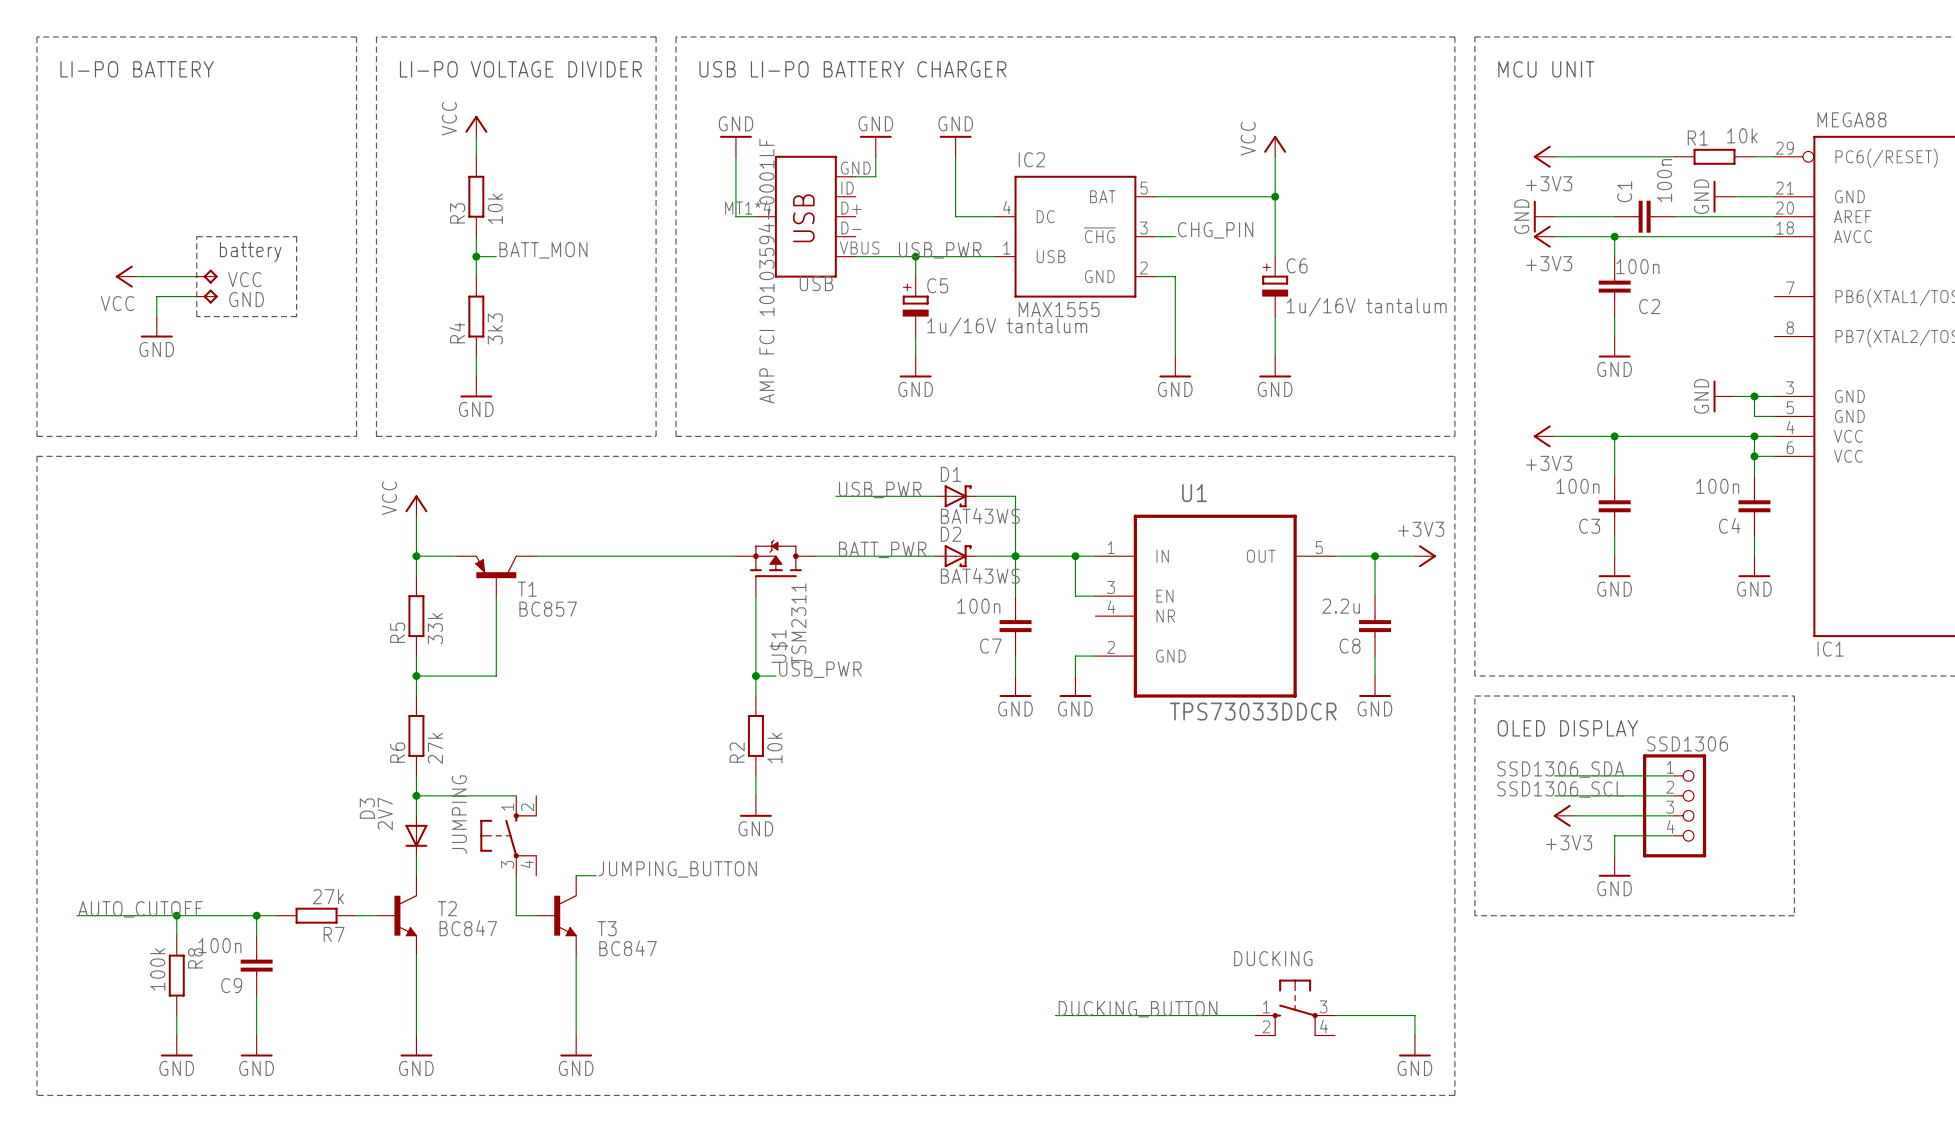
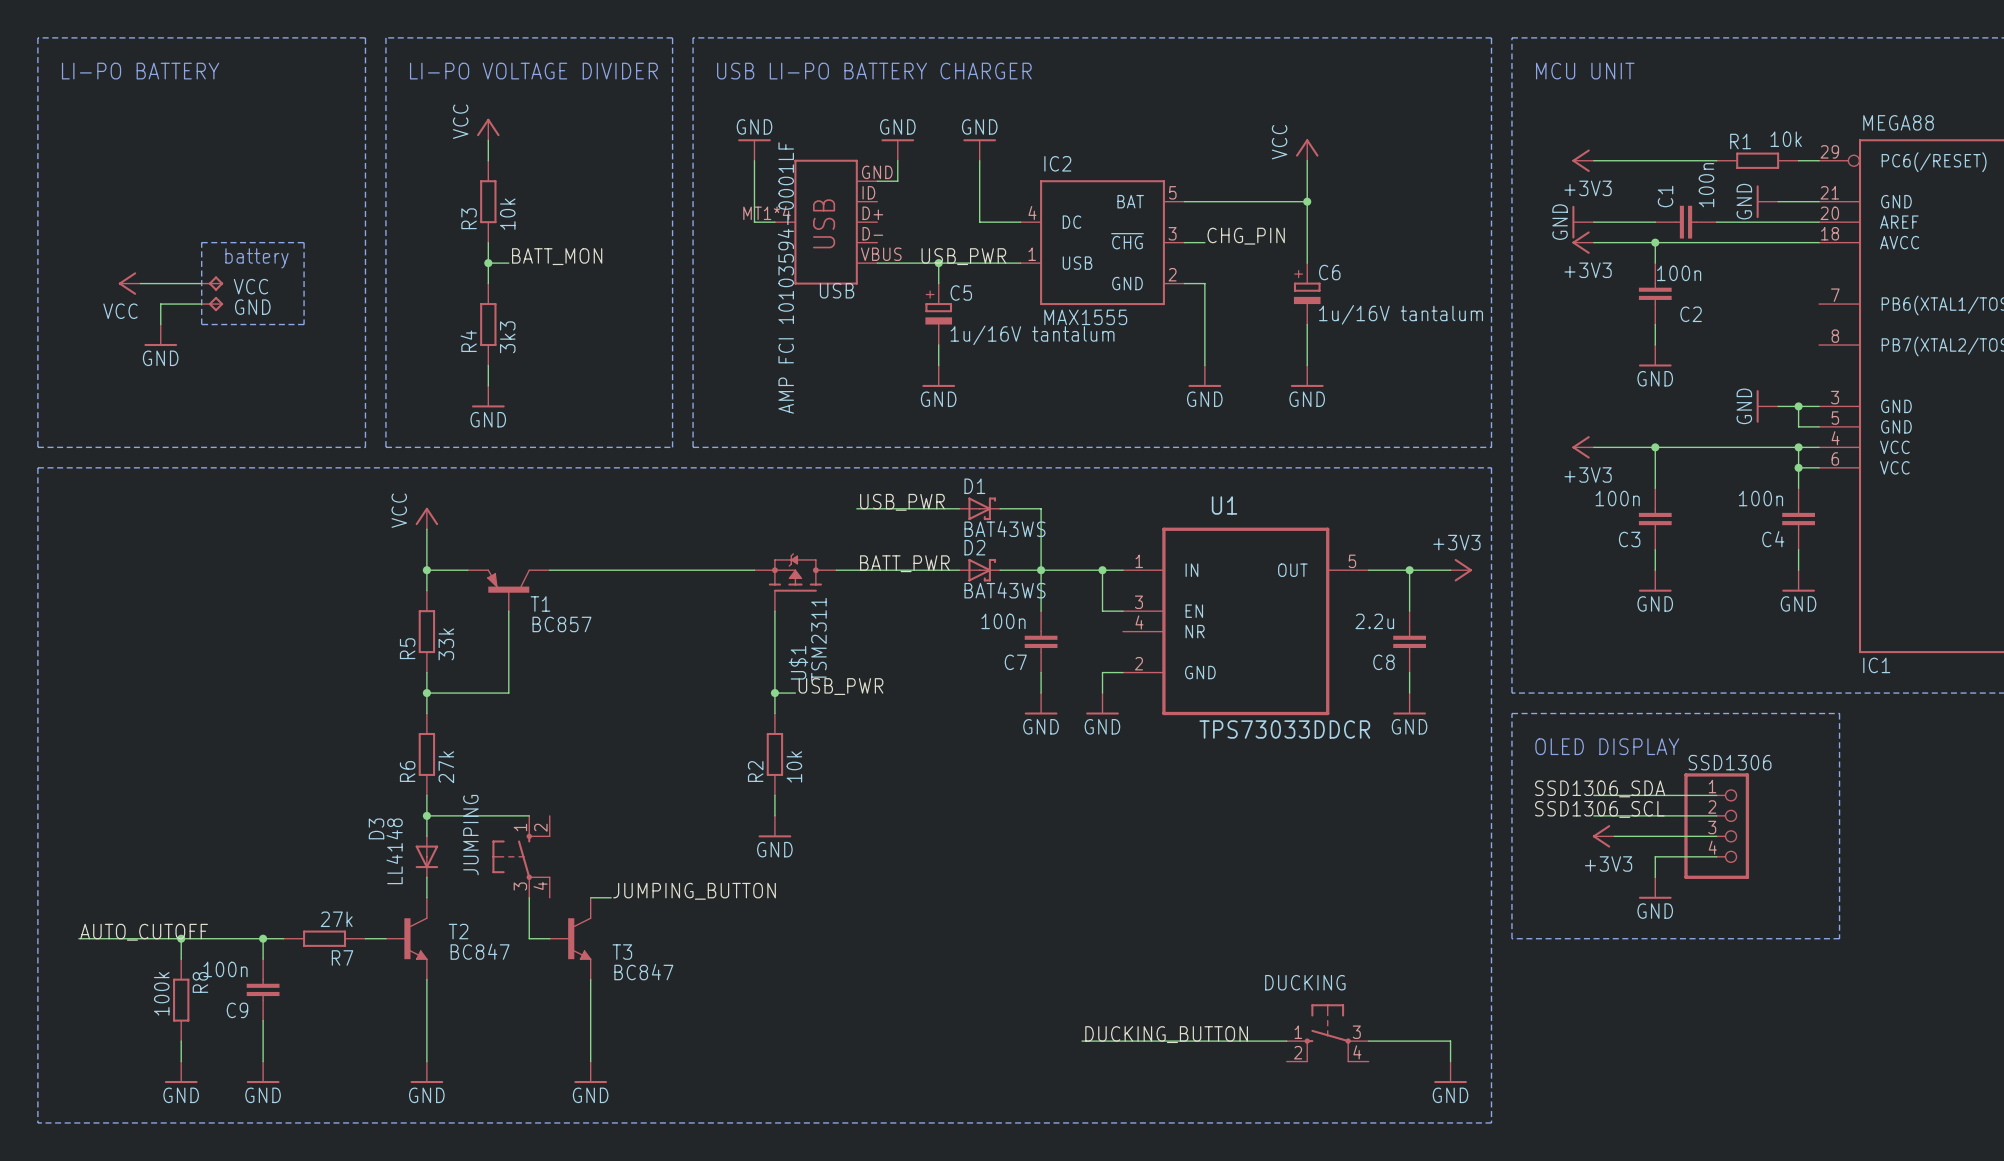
D3 value: 2V7 (385, 813) -> LL4148 (394, 851)

